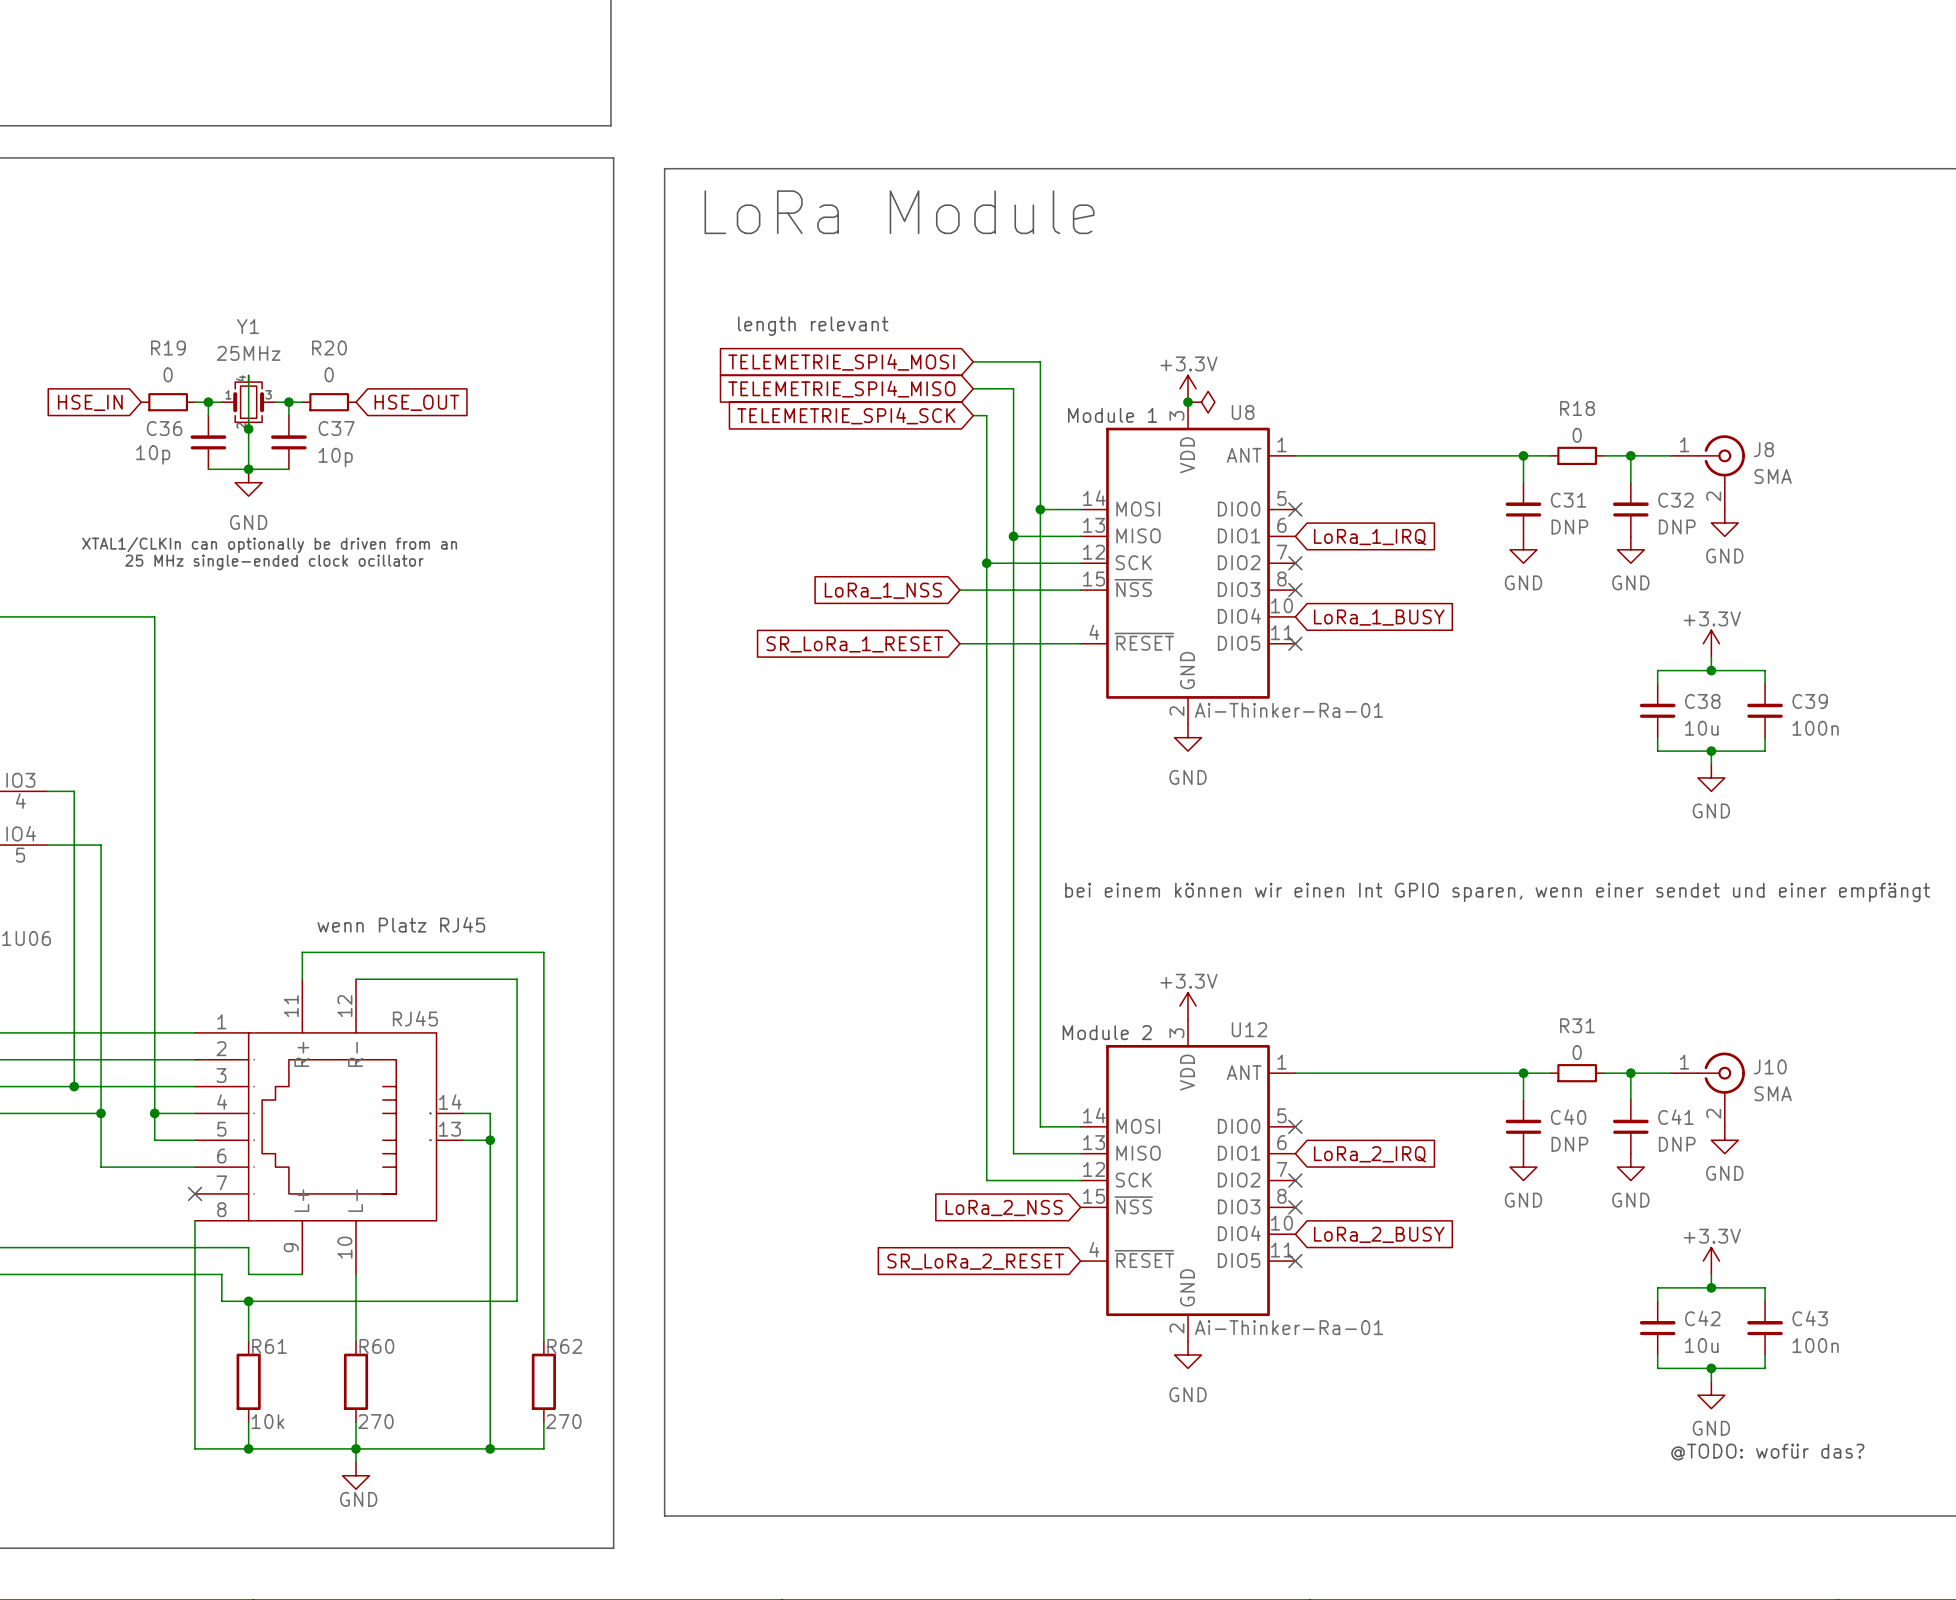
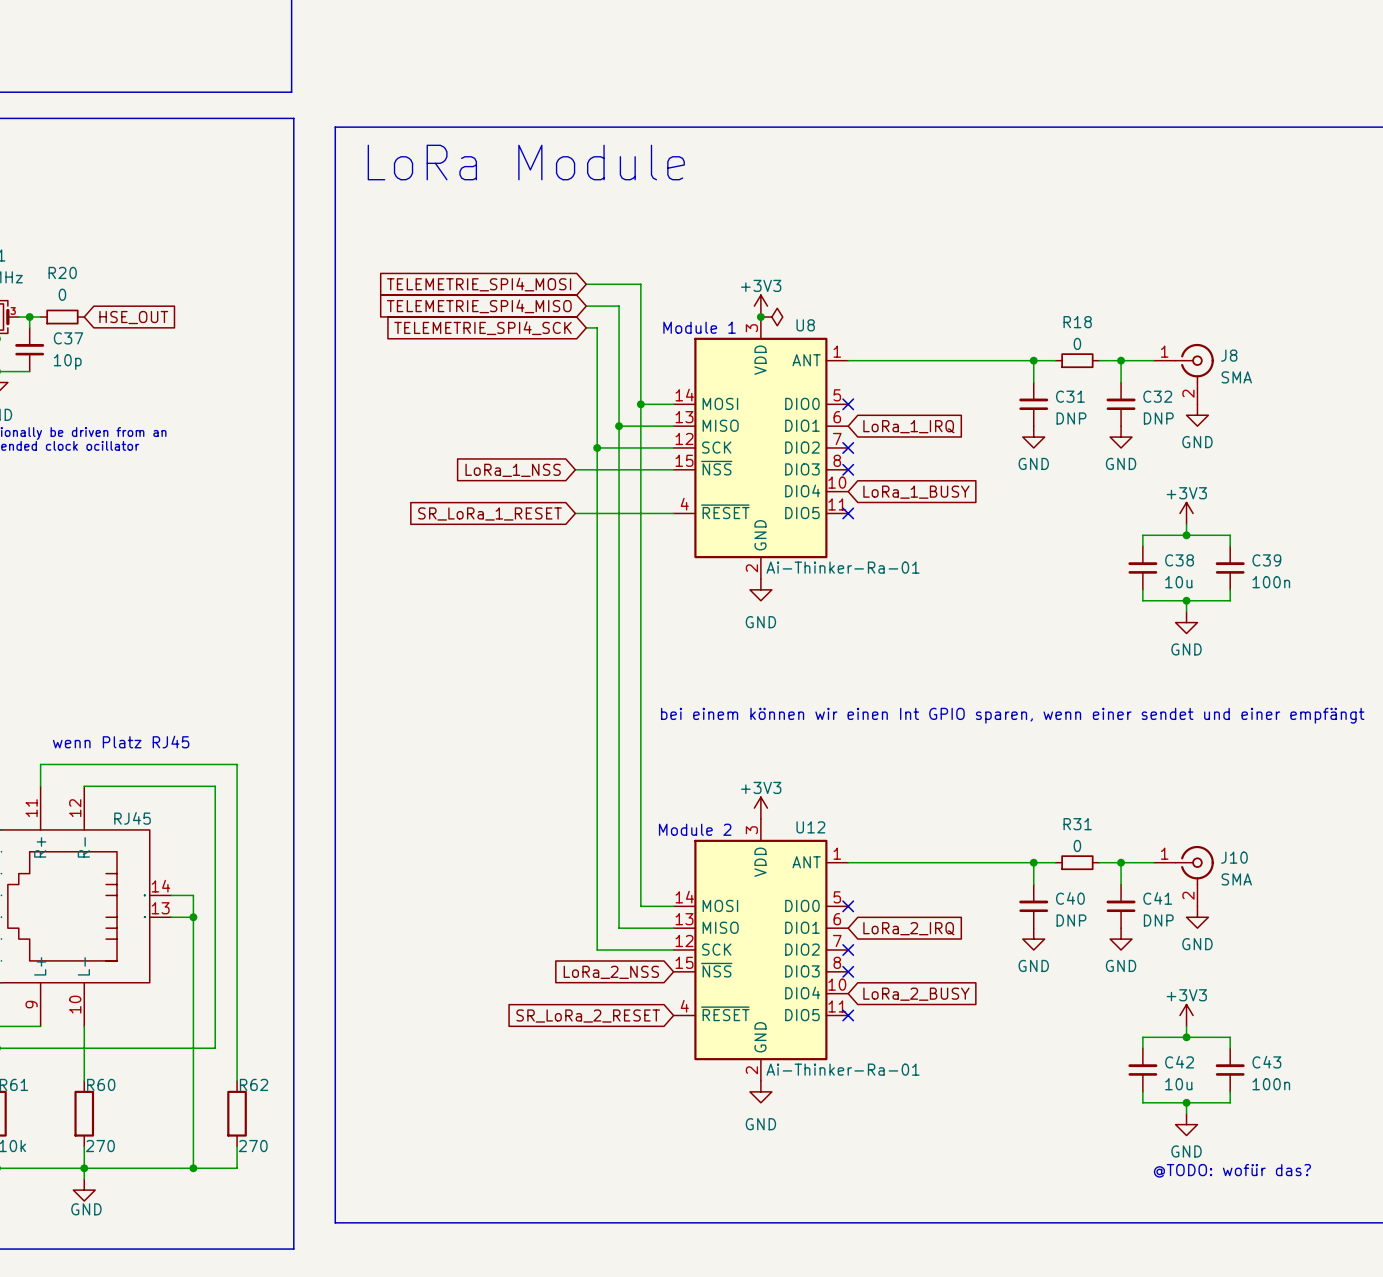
text: length relevant (813, 326) -> none
power symbol: +3.3V (1188, 388) -> +3V3 (760, 306)
power symbol: +3.3V (1711, 643) -> +3V3 (1186, 513)
power symbol: +3.3V (1188, 1006) -> +3V3 (760, 808)
power symbol: +3.3V (1711, 1261) -> +3V3 (1186, 1015)

